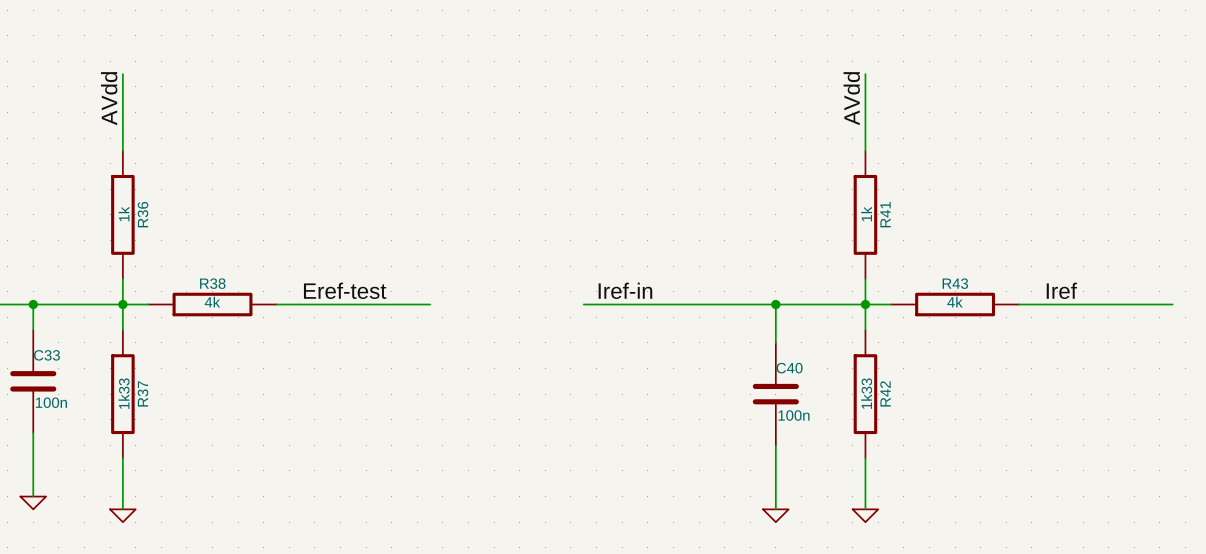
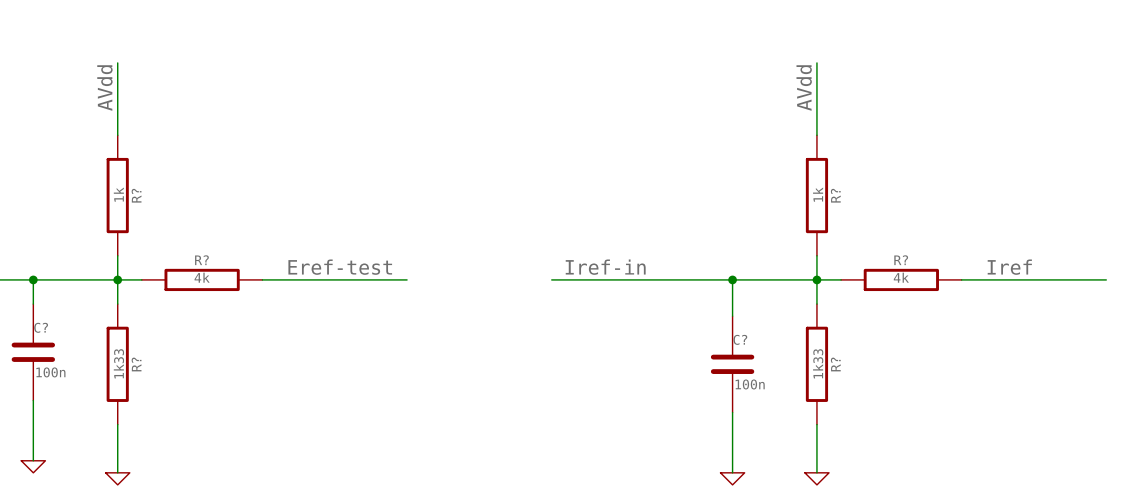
R36 name: R36 (142, 214) -> R? (136, 195)
R41 name: R41 (885, 214) -> R? (835, 195)
R38 name: R38 (212, 283) -> R? (201, 260)
R43 name: R43 (955, 283) -> R? (901, 260)
C33 name: C33 (46, 355) -> C? (41, 327)
C40 name: C40 (789, 368) -> C? (740, 339)
R37 name: R37 (142, 393) -> R? (136, 364)
R42 name: R42 (885, 393) -> R? (835, 364)

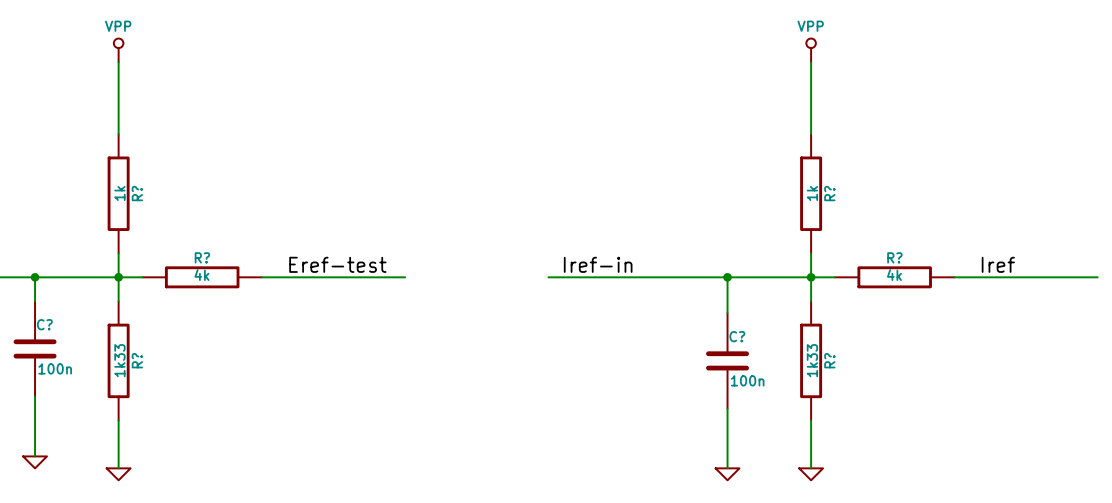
power symbol: none -> VPP (118, 50)
power symbol: none -> VPP (811, 50)
label: AVdd (104, 88) -> none
label: AVdd (804, 88) -> none

